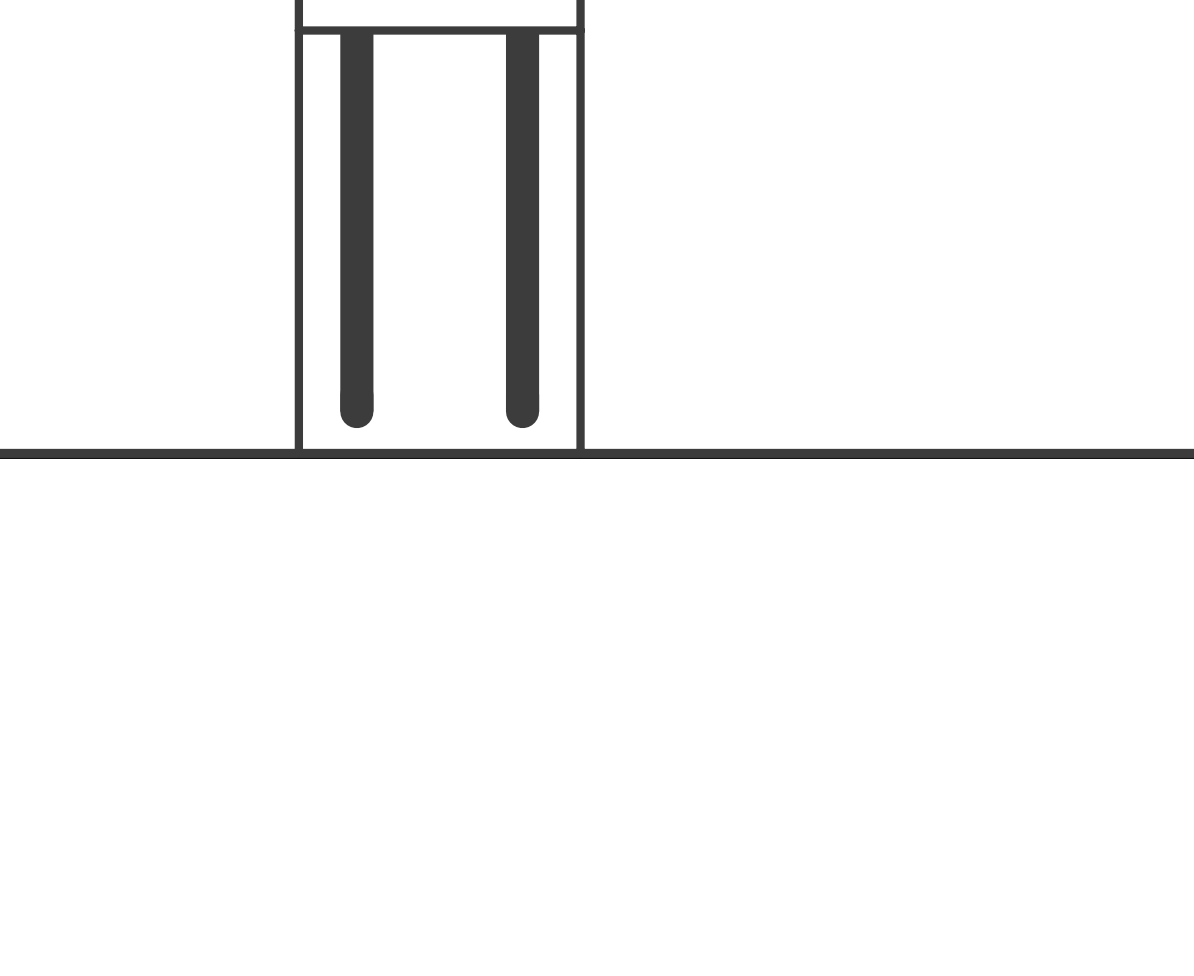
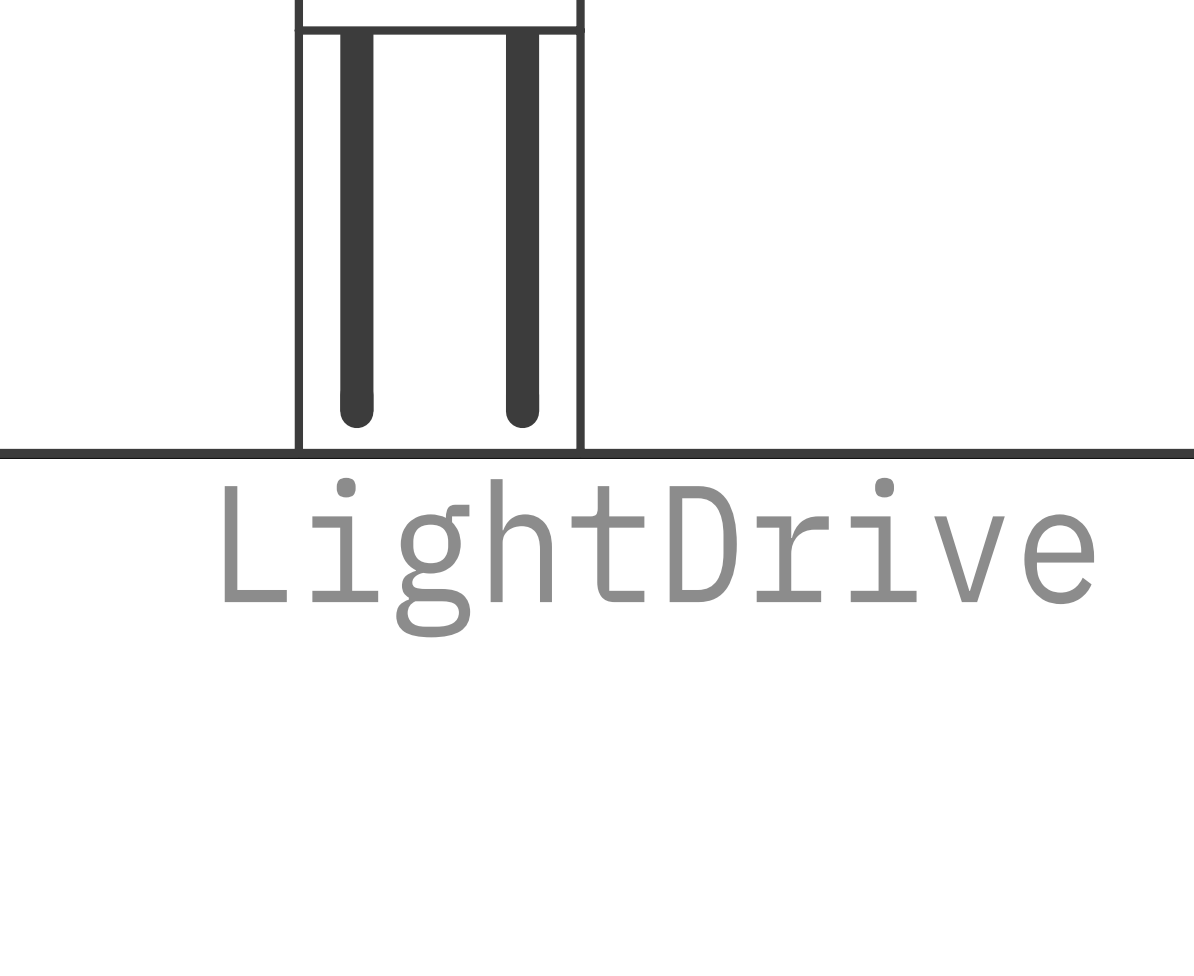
part value: none -> LightDrive (659, 557)

